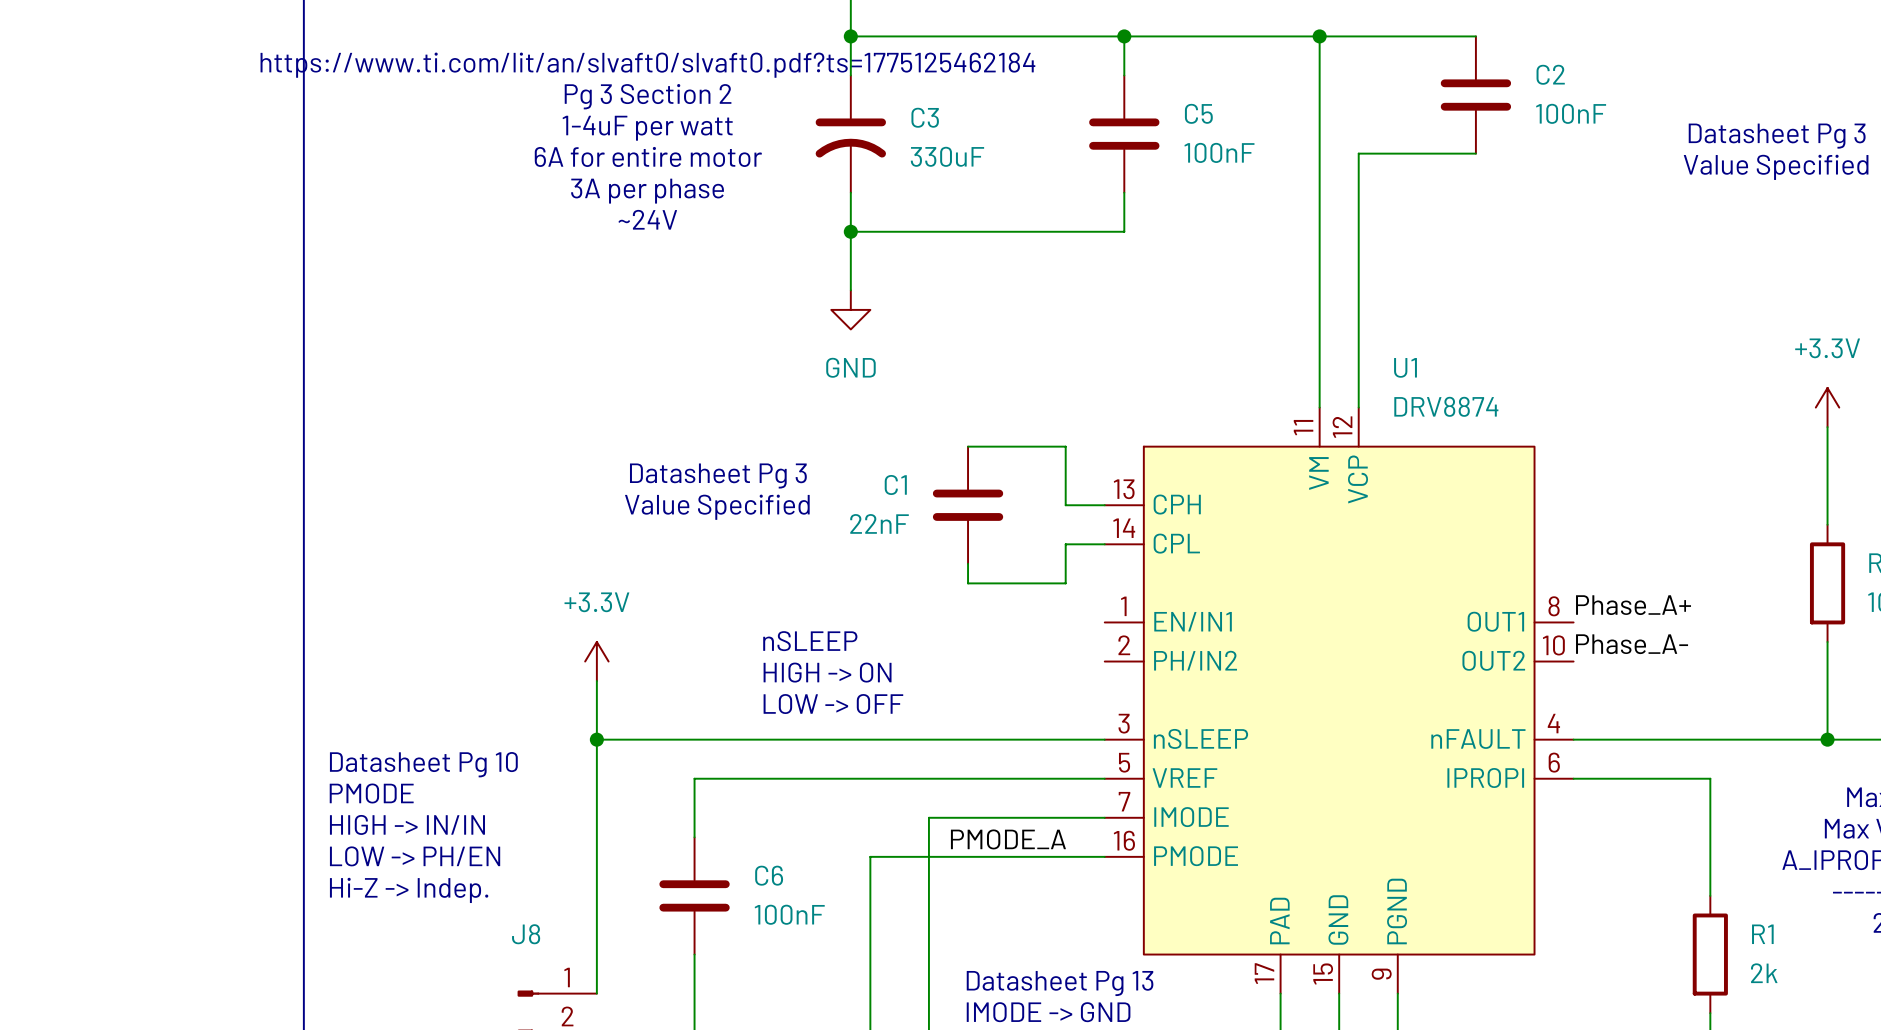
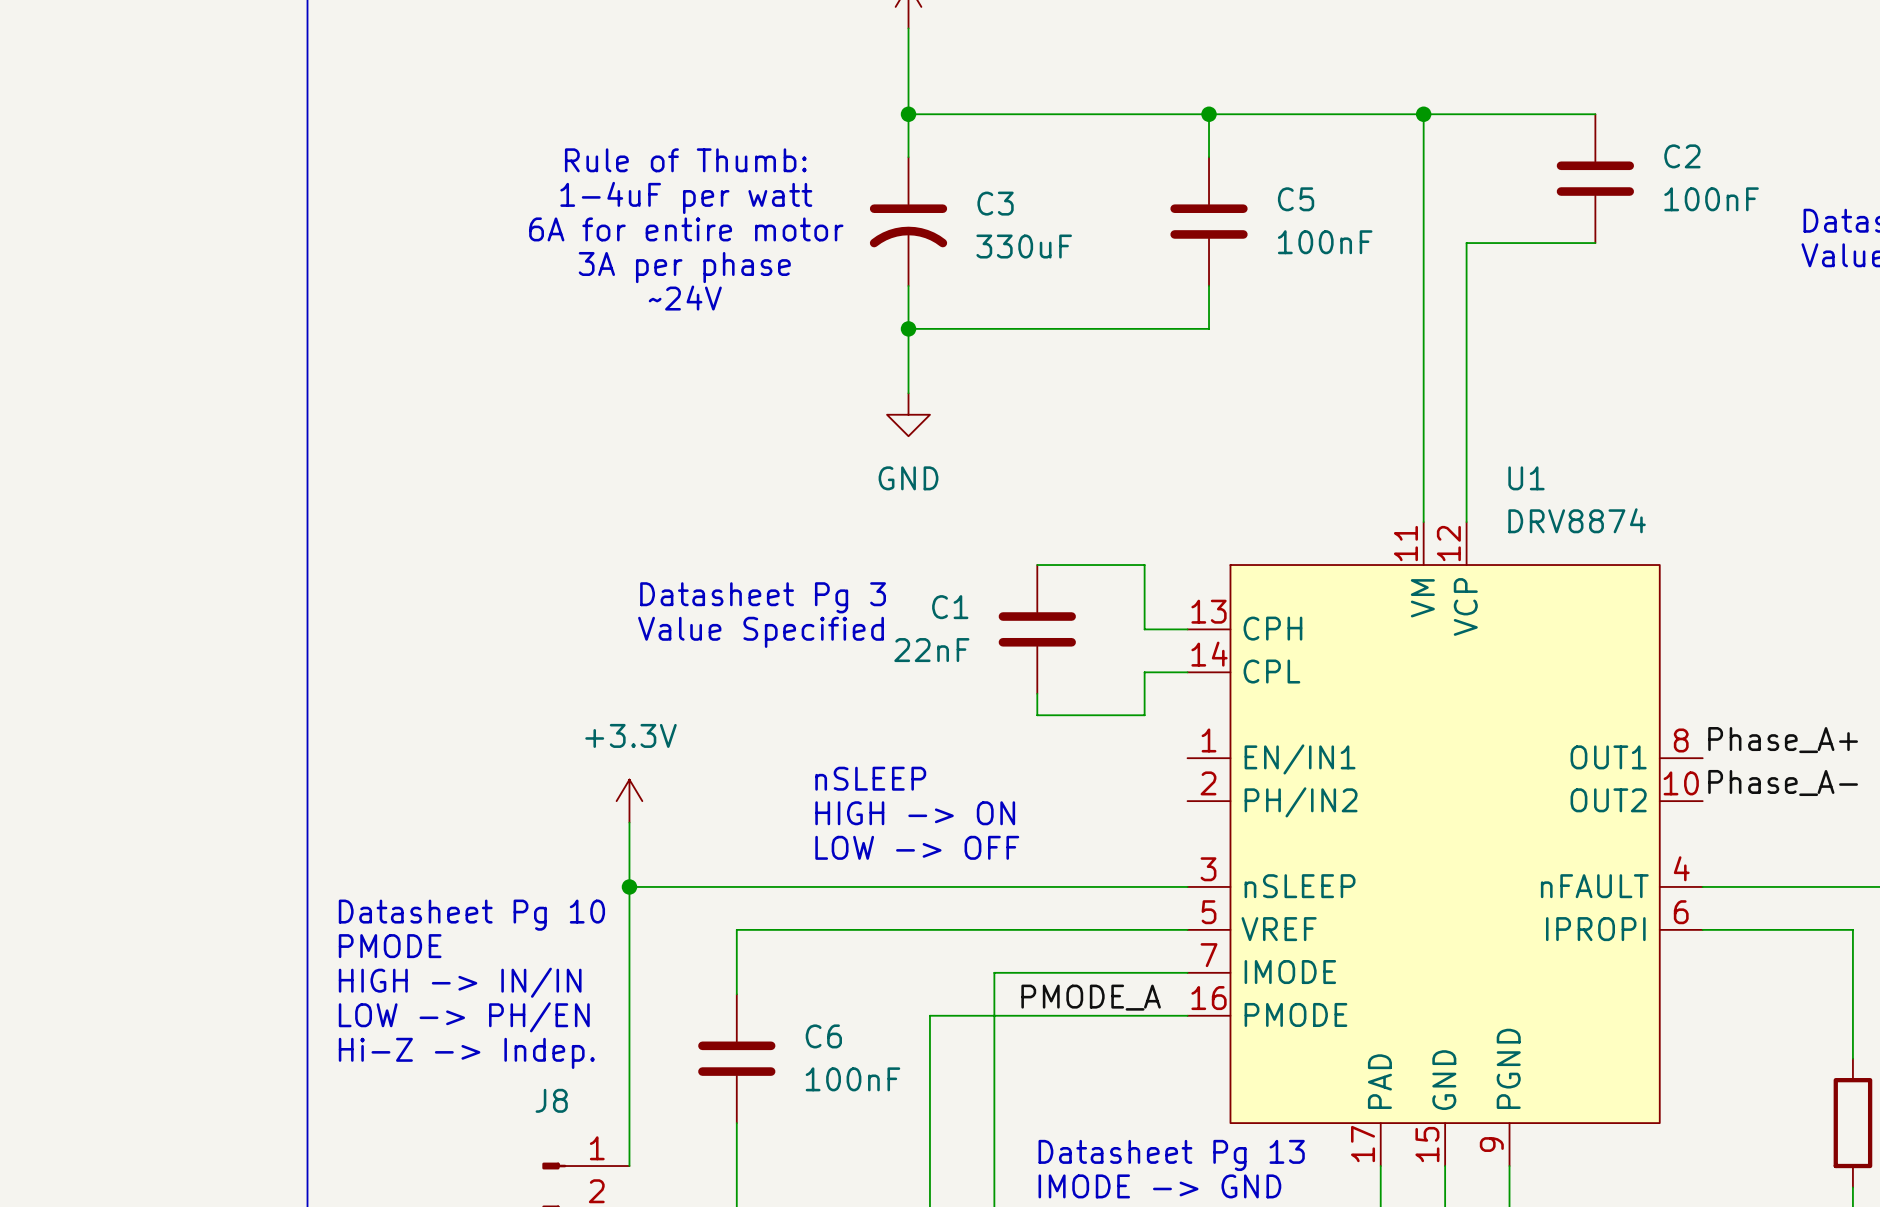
text: https://www.ti.com/lit/an/slvaft0/slvaft0.pdf?ts=1775125462184 (647, 65) -> none
text: none -> Rule of Thumb: (685, 160)
text: Pg 3 Section 2 (648, 96) -> none
text position: 1-4uF per watt (647, 128) -> 1-4uF per watt (686, 197)
text position: 6A for entire motor (648, 156) -> 6A for entire motor (686, 229)
text position: 3A per phase (647, 191) -> 3A per phase (684, 267)
text position: ~24V (647, 219) -> ~24V (685, 298)

